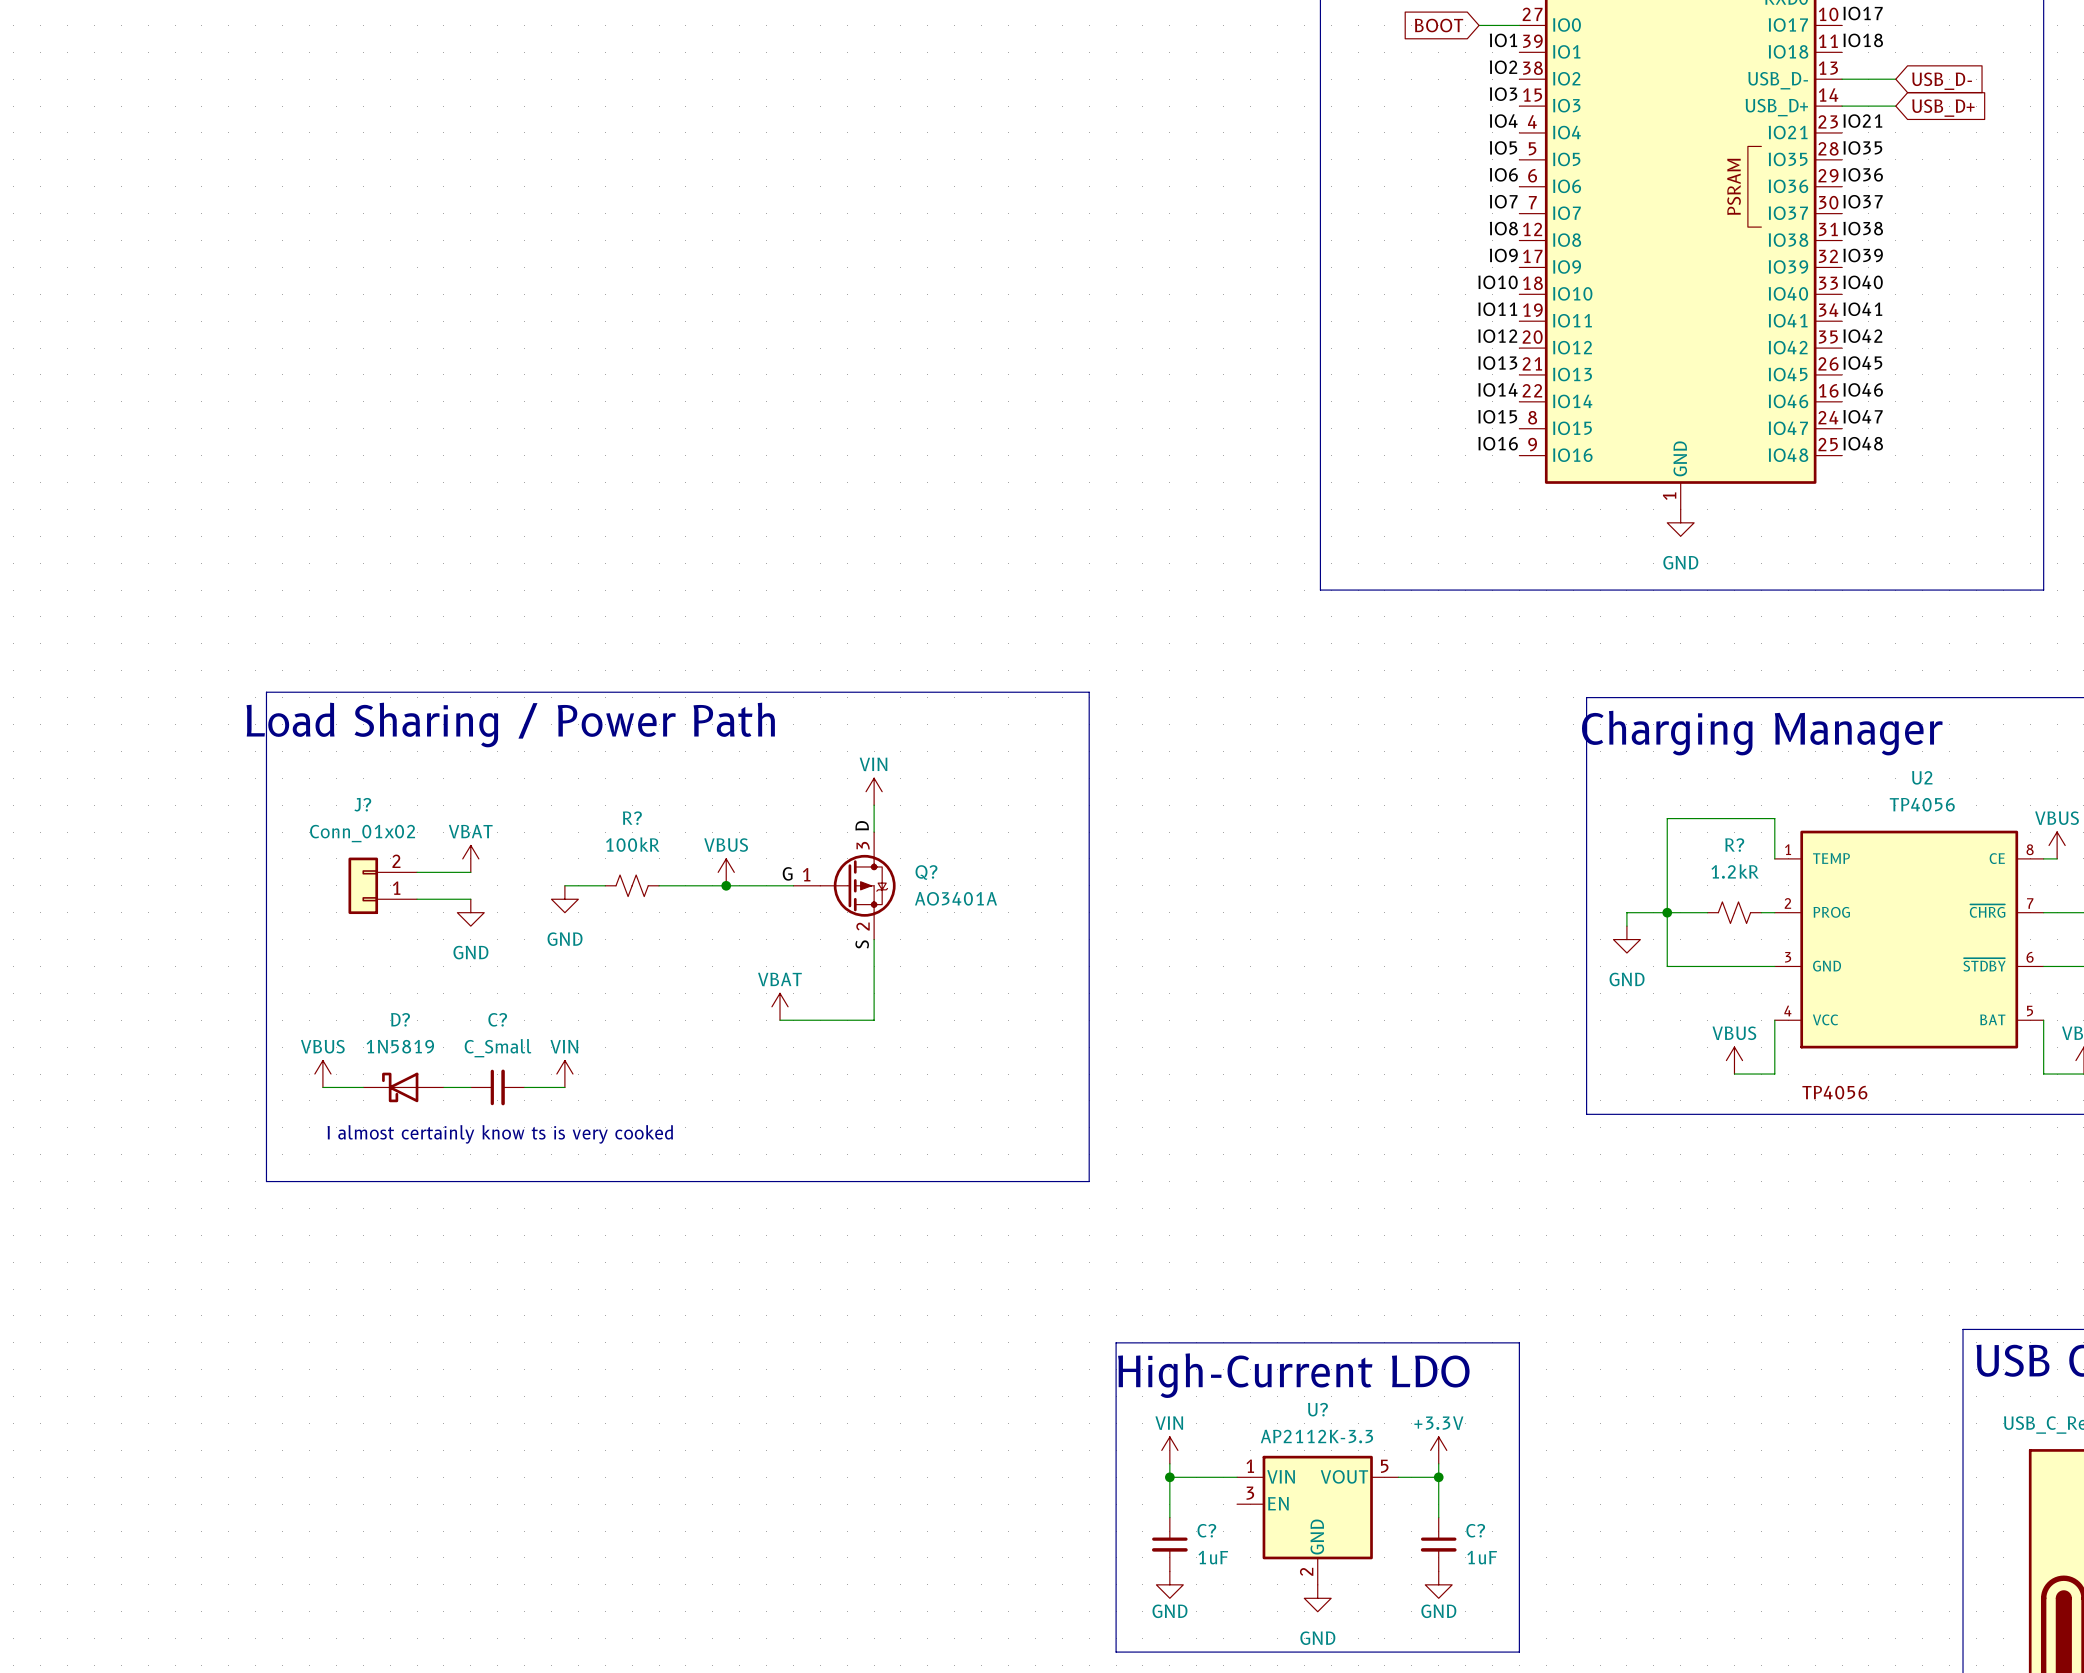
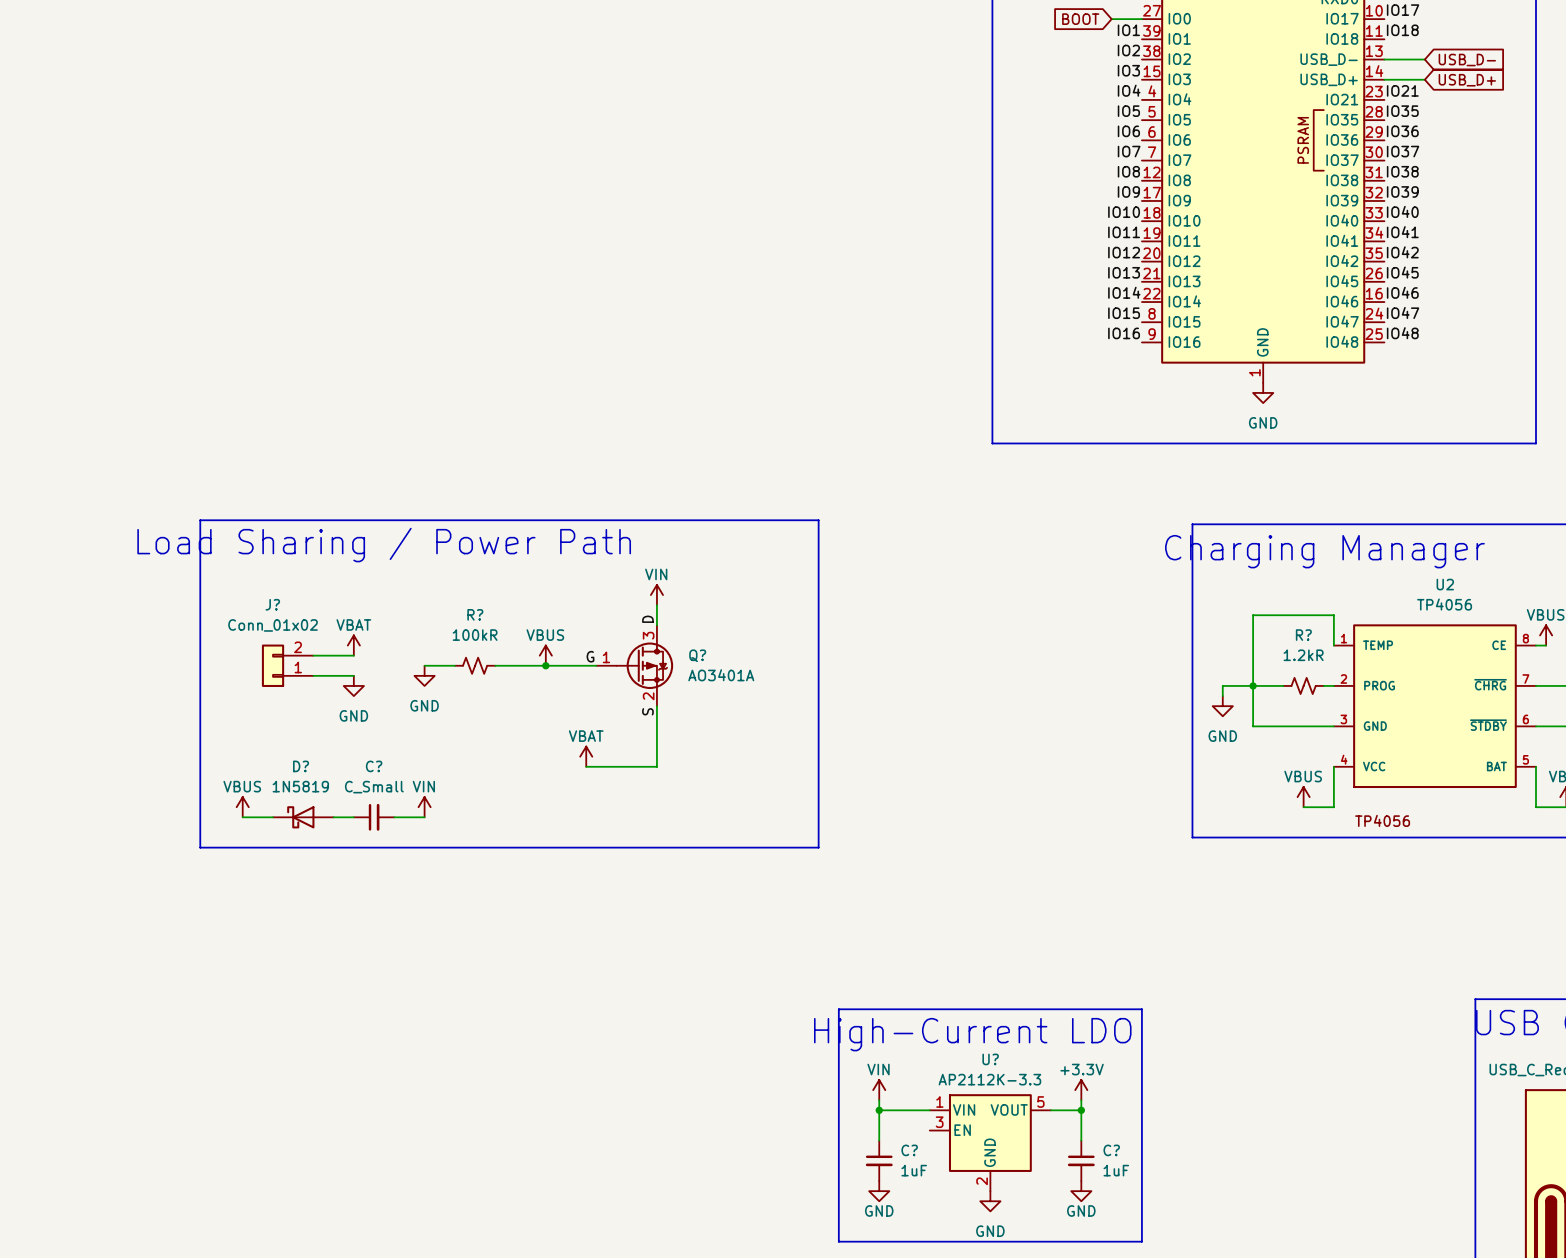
line: (266, 1127) (266, 1181) (1089, 1181) (1089, 1127) -> (200, 847) (818, 847)
text: I almost certainly know ts is very cooked (500, 1134) -> none

